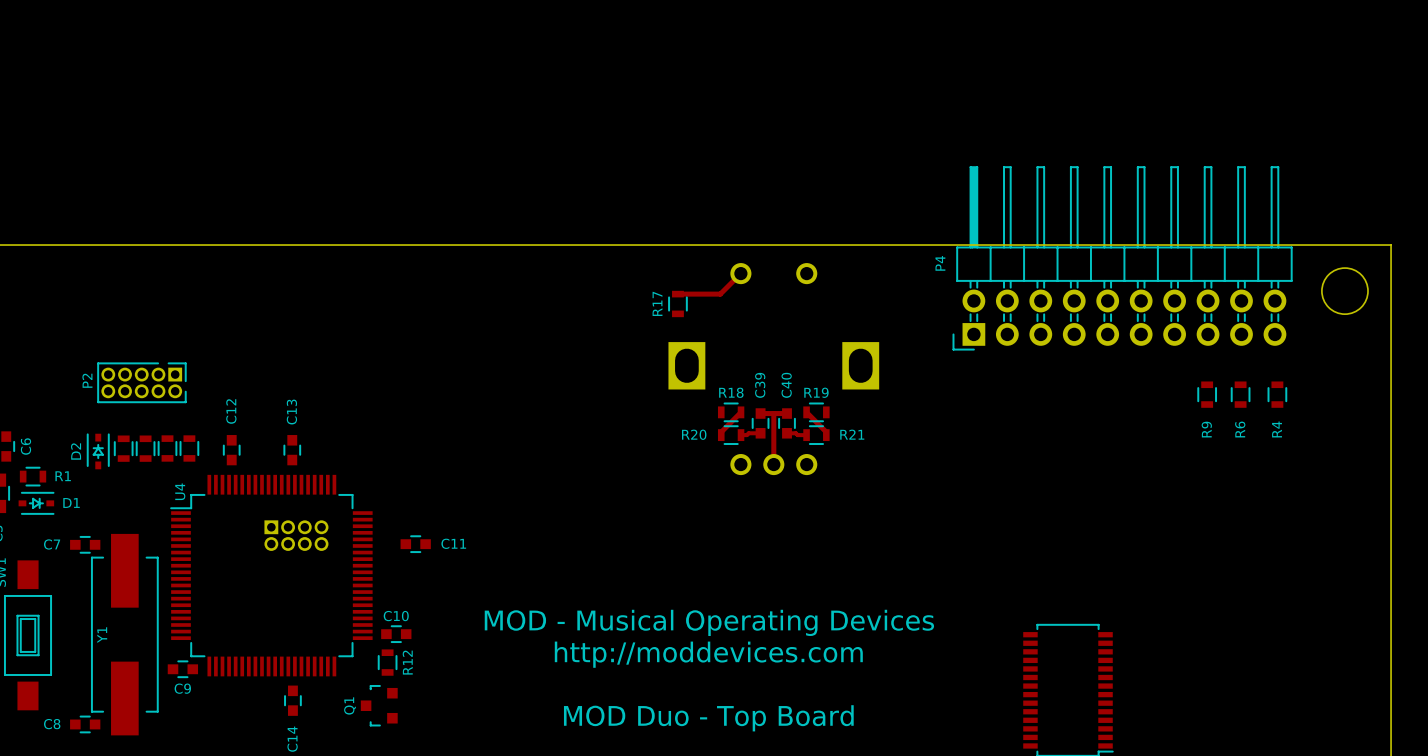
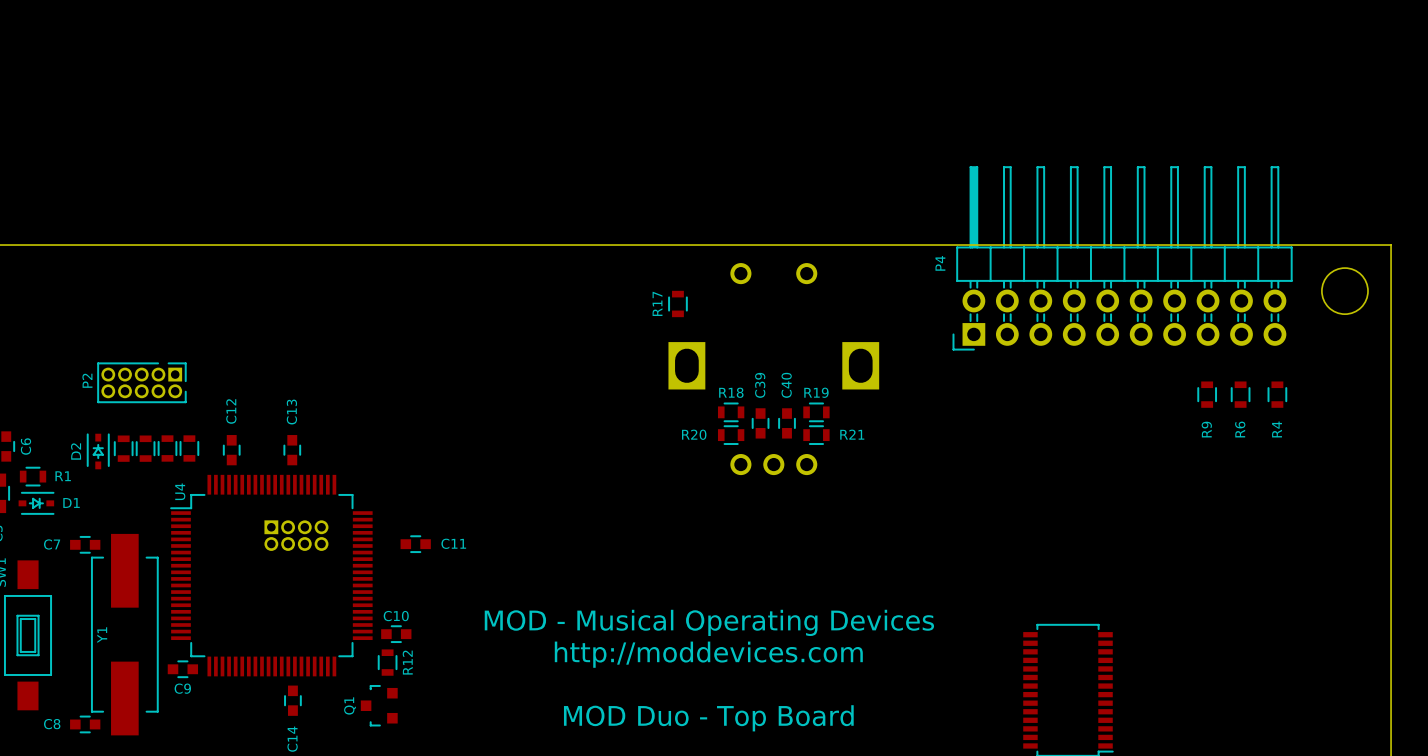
track: (740, 273) (720, 294) (677, 294) -> none
track: (741, 412) (721, 432) (721, 435) -> none
track: (806, 412) (826, 432) (826, 435) -> none
track: (760, 413) (787, 413) -> none
track: (773, 413) (773, 464) -> none
track: (760, 433) (741, 435) -> none
track: (787, 433) (806, 435) -> none

